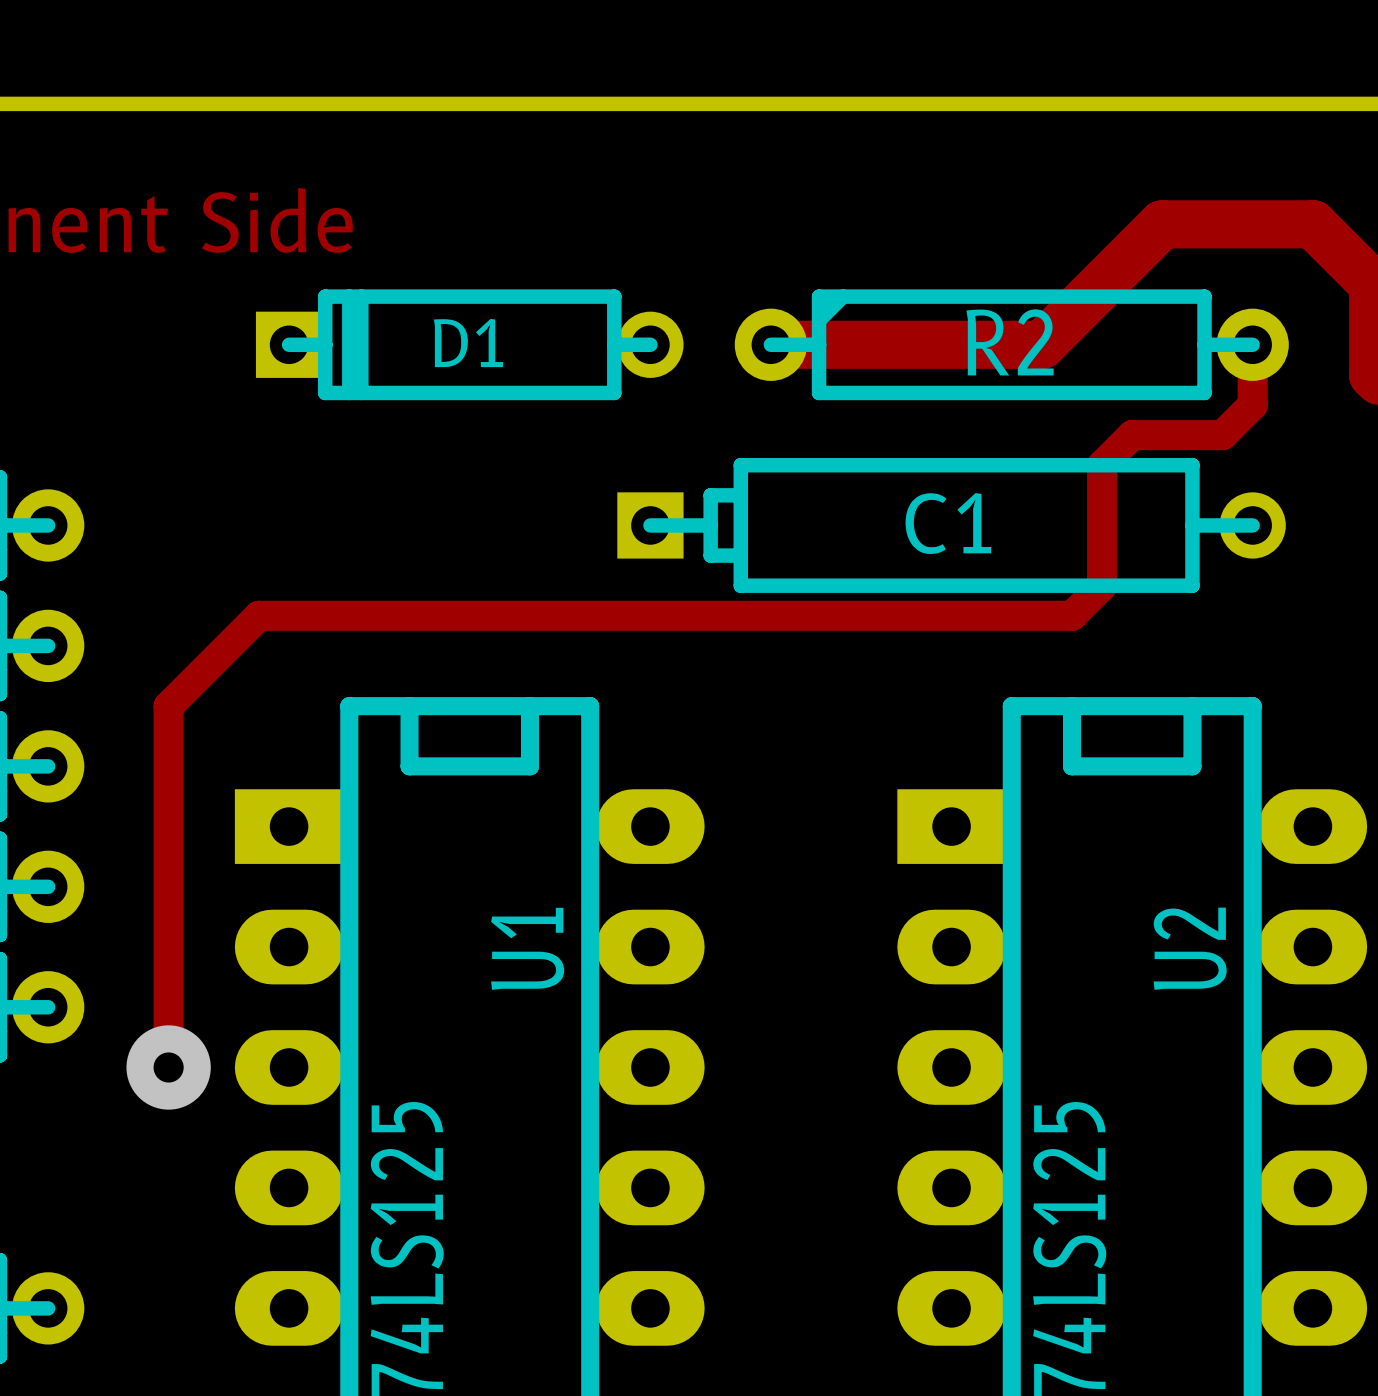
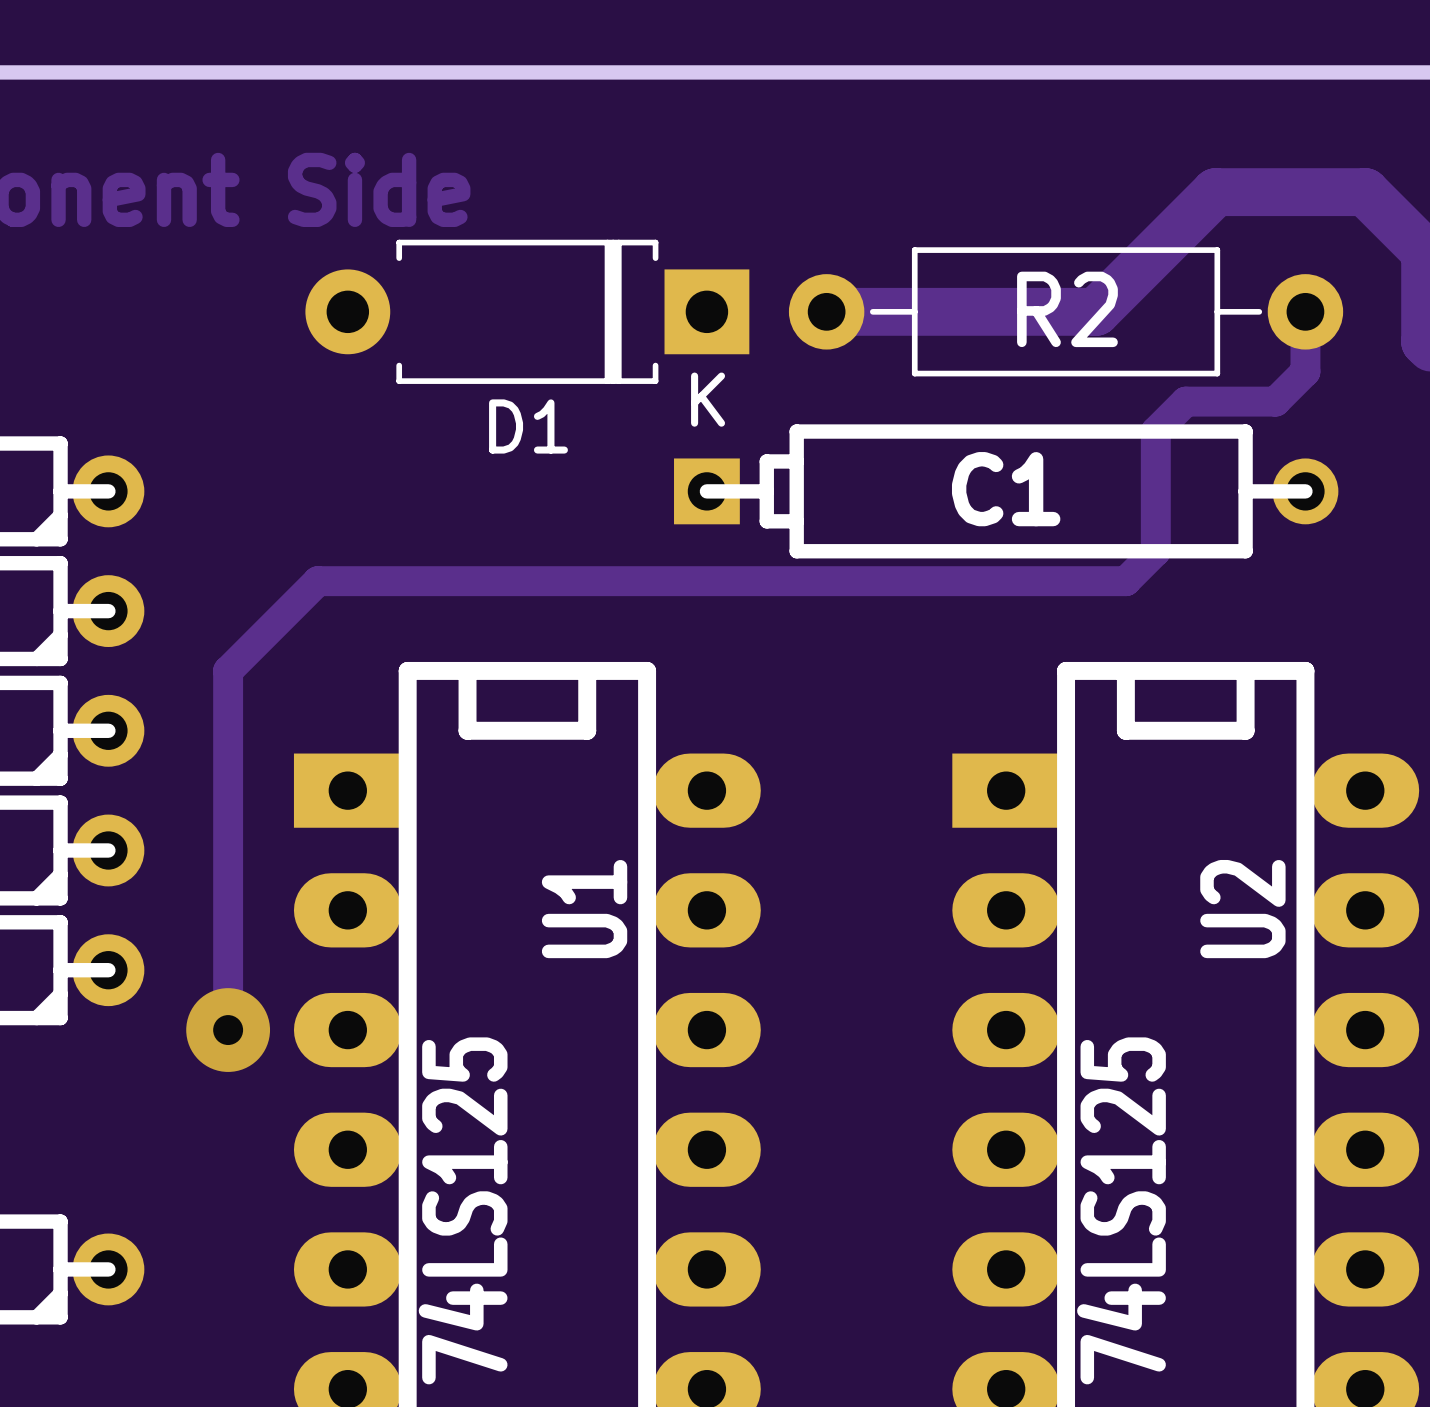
D1 footprint: [255, 289, 684, 401] -> [305, 239, 750, 384]
R2 footprint: [734, 289, 1289, 401] -> [788, 247, 1344, 377]
D1 name position: D1 (468, 342) -> D1 (528, 426)

